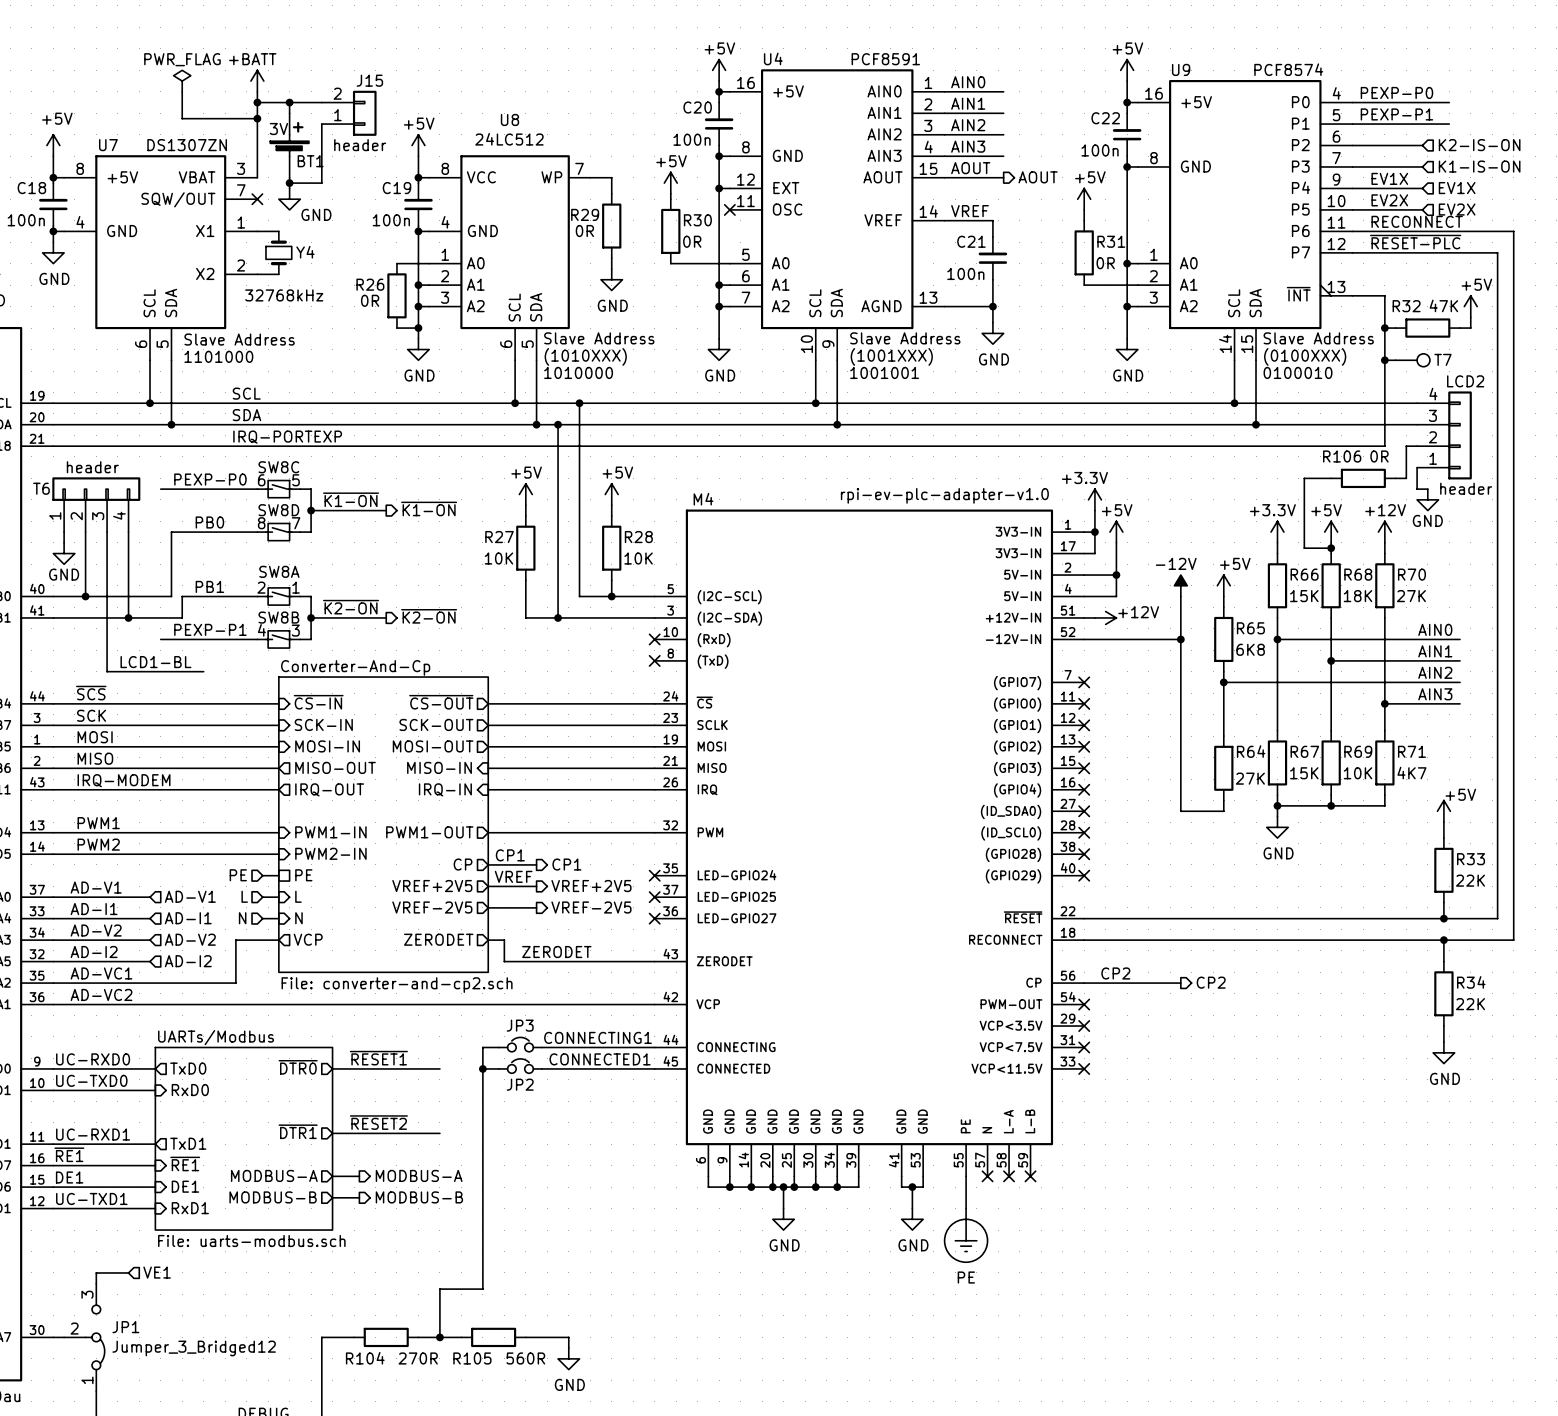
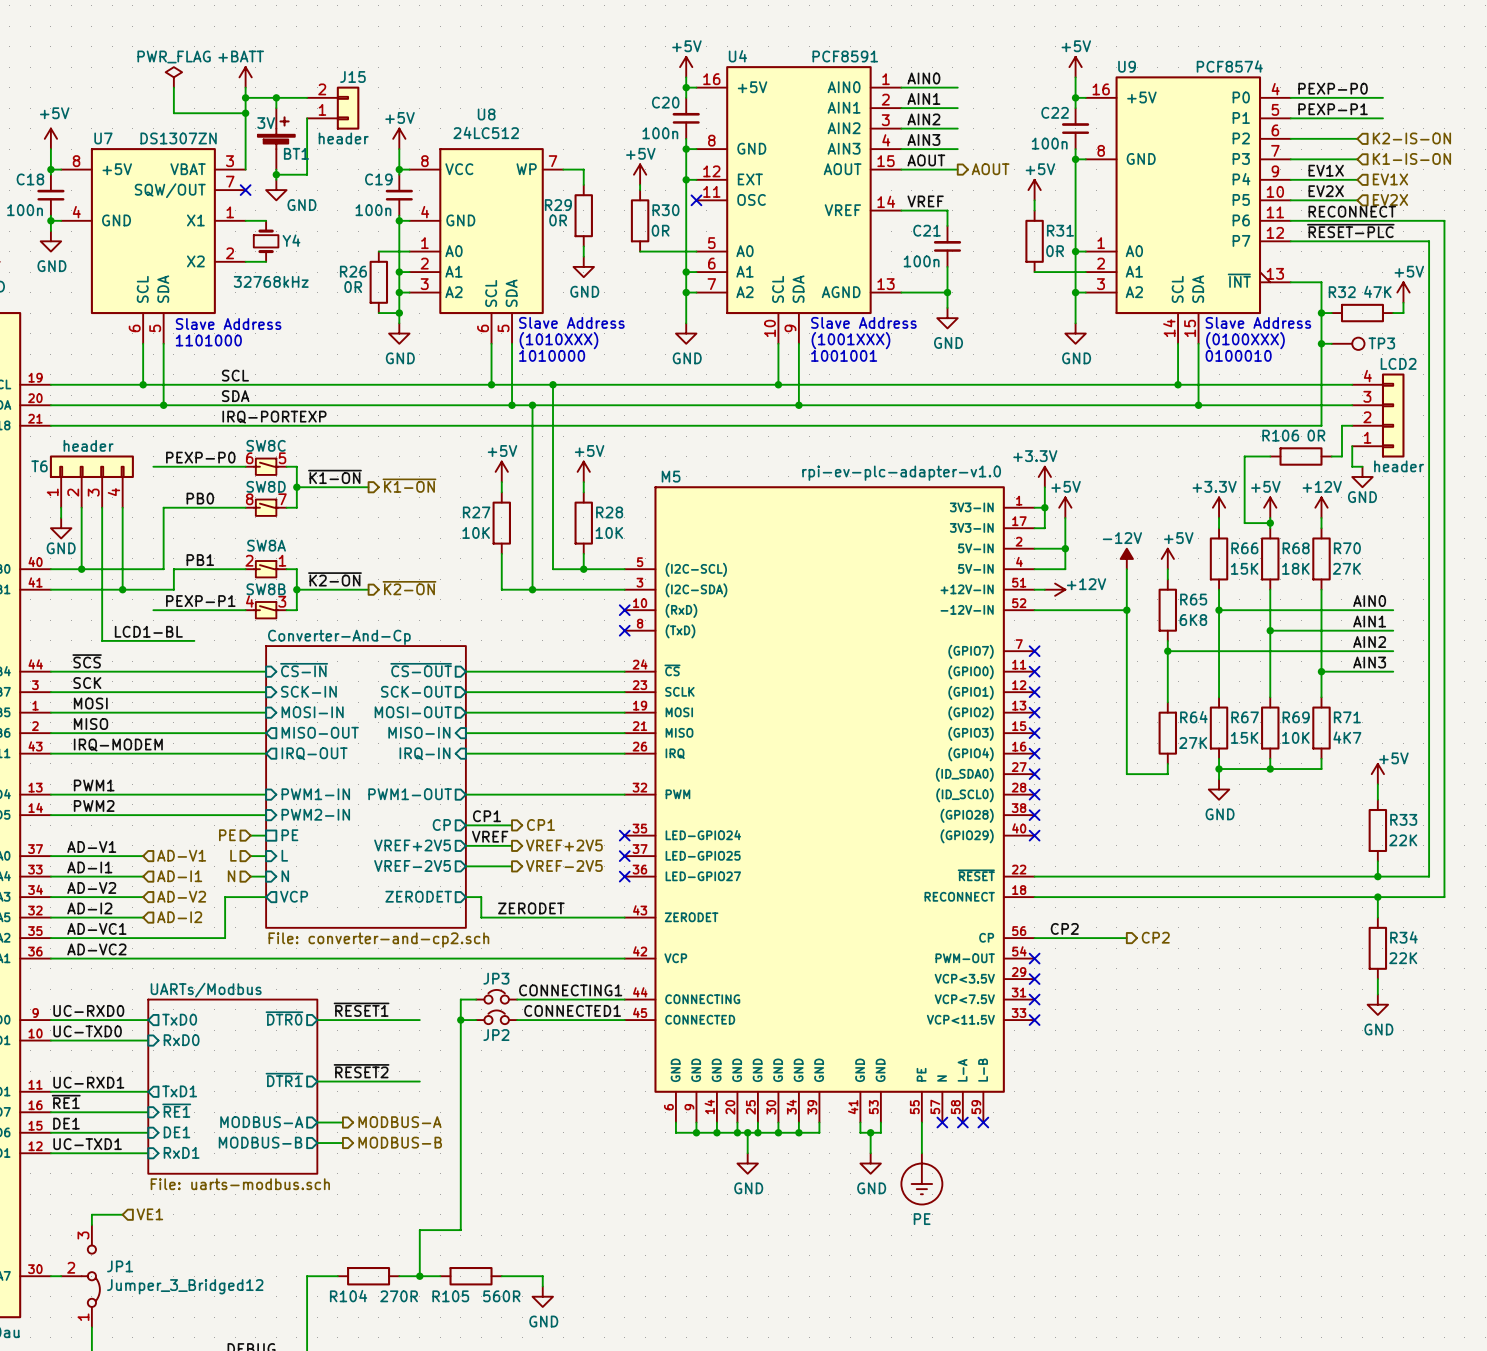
T7 name: T7 (1442, 359) -> TP3 (1381, 343)
M4 name: M4 (703, 499) -> M5 (671, 476)

